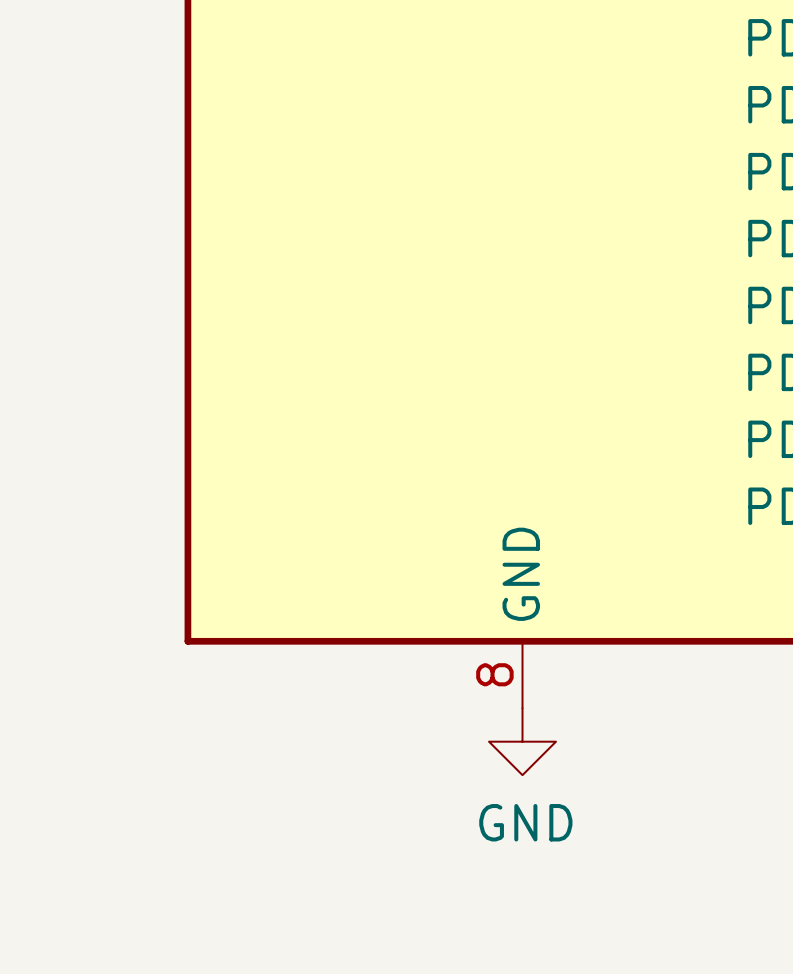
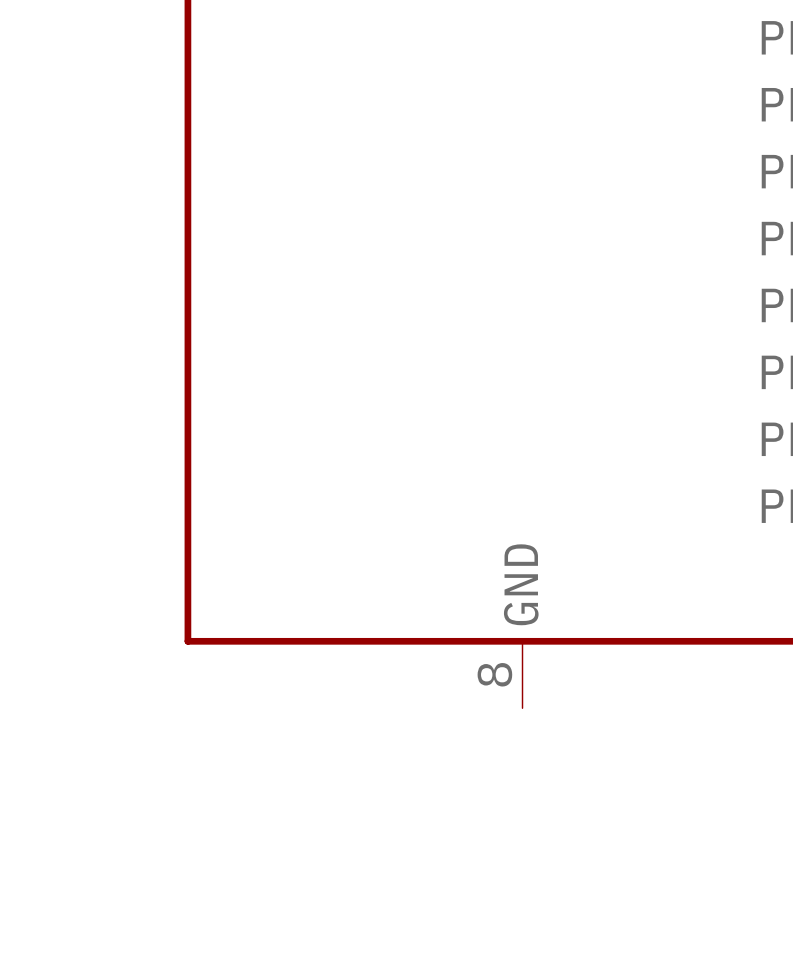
power symbol: GND (522, 741) -> none

